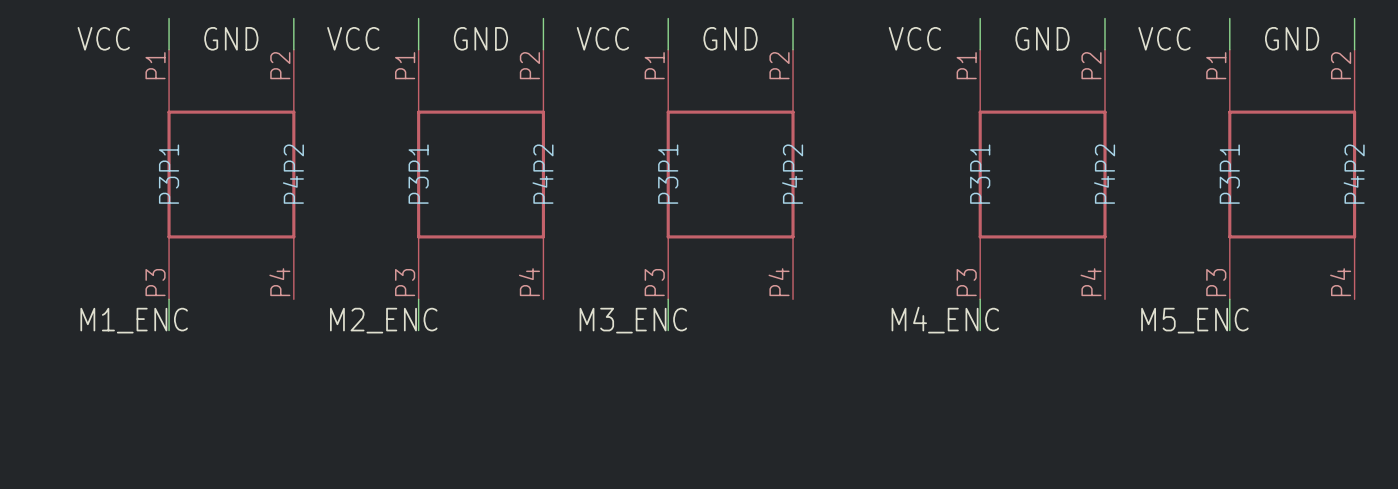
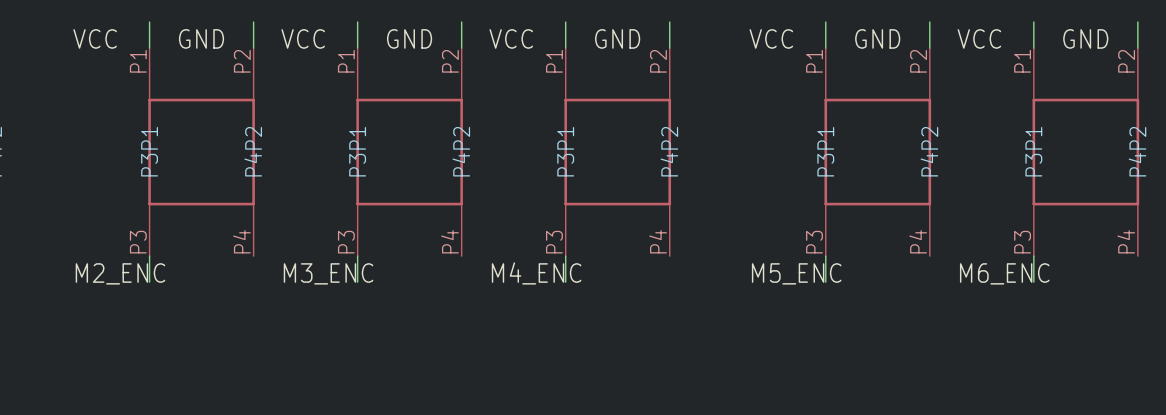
label: M1_ENC (134, 320) -> M2_ENC (120, 273)
label: M2_ENC (383, 320) -> M3_ENC (328, 273)
label: M3_ENC (633, 320) -> M4_ENC (536, 273)
label: M4_ENC (945, 320) -> M5_ENC (796, 273)
label: M5_ENC (1194, 320) -> M6_ENC (1004, 273)

